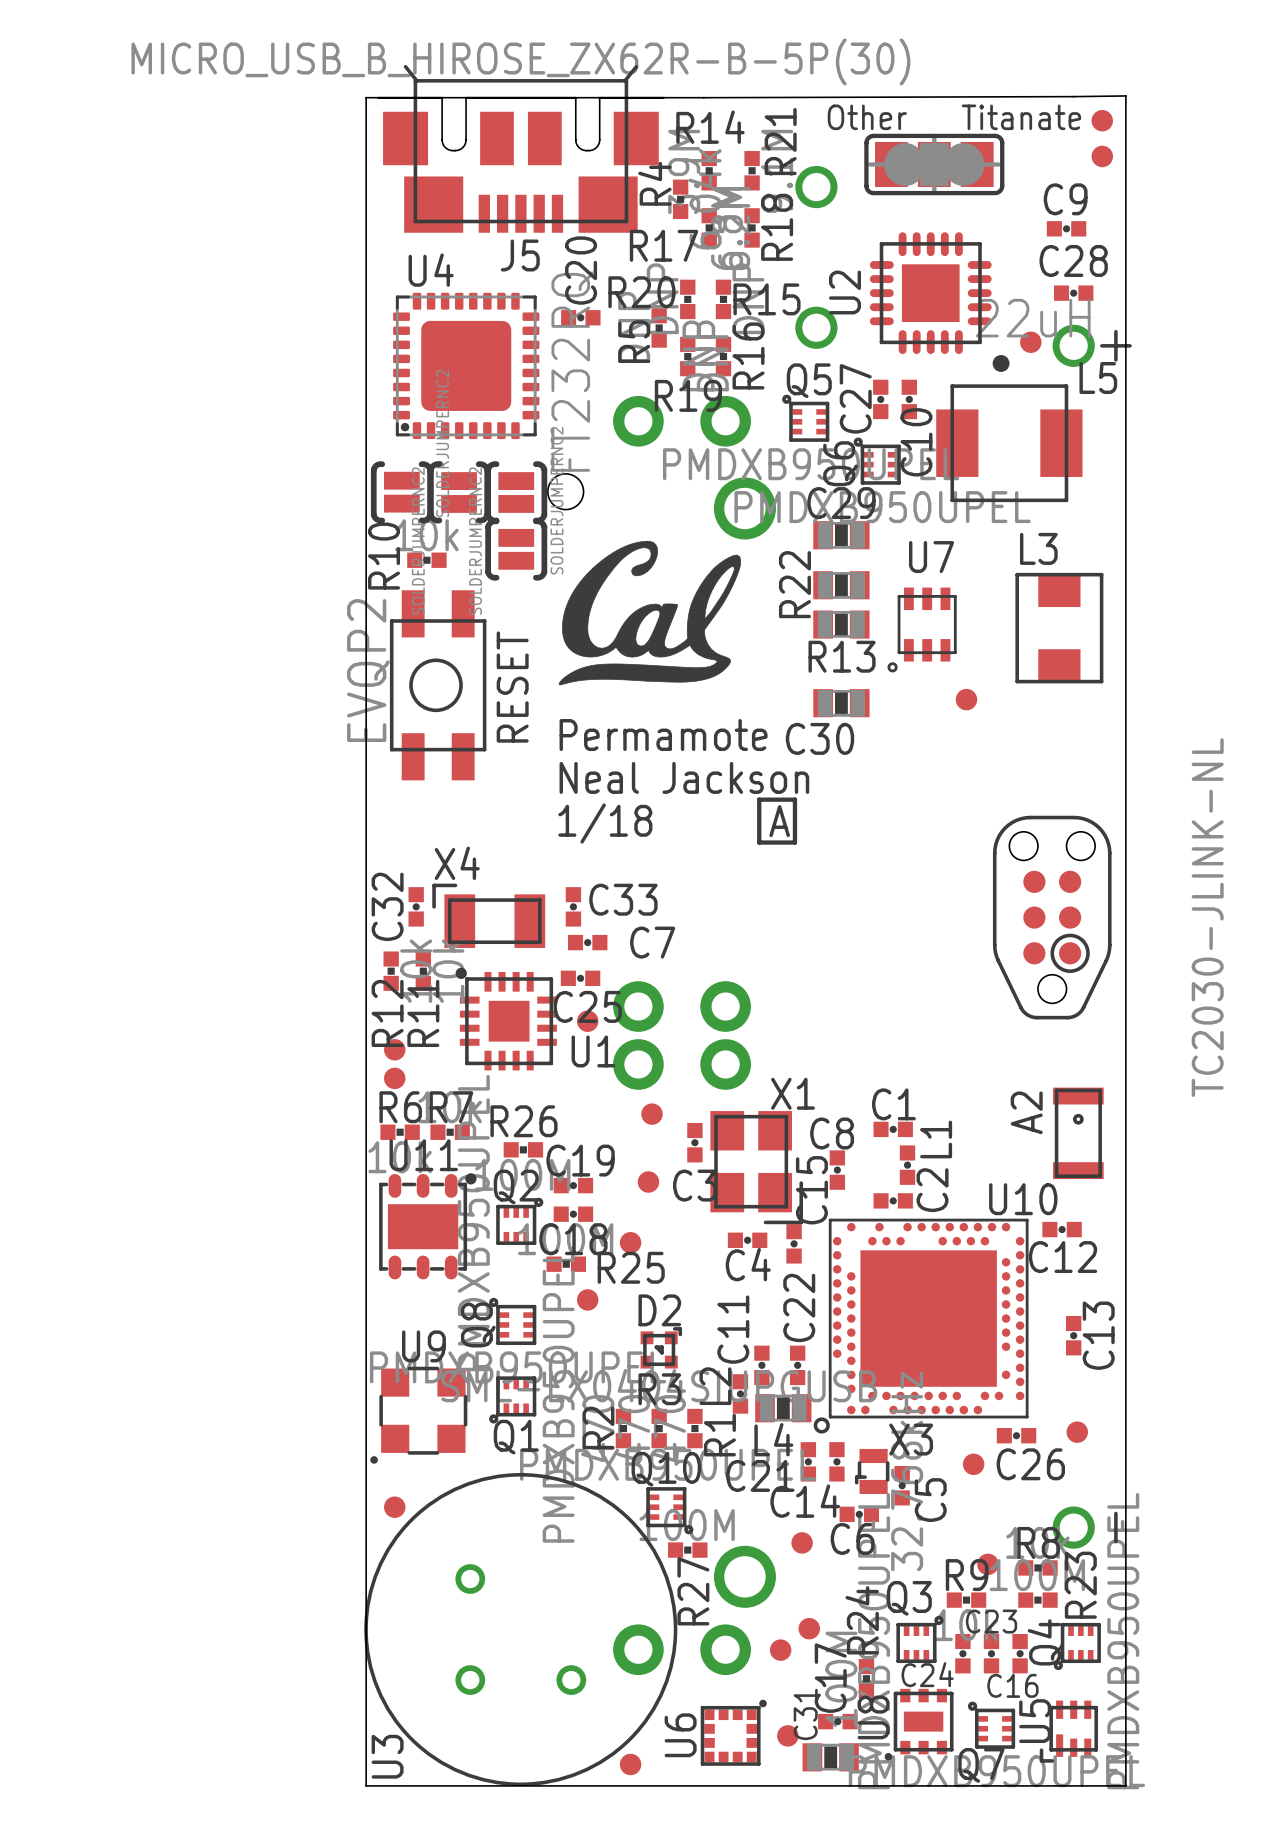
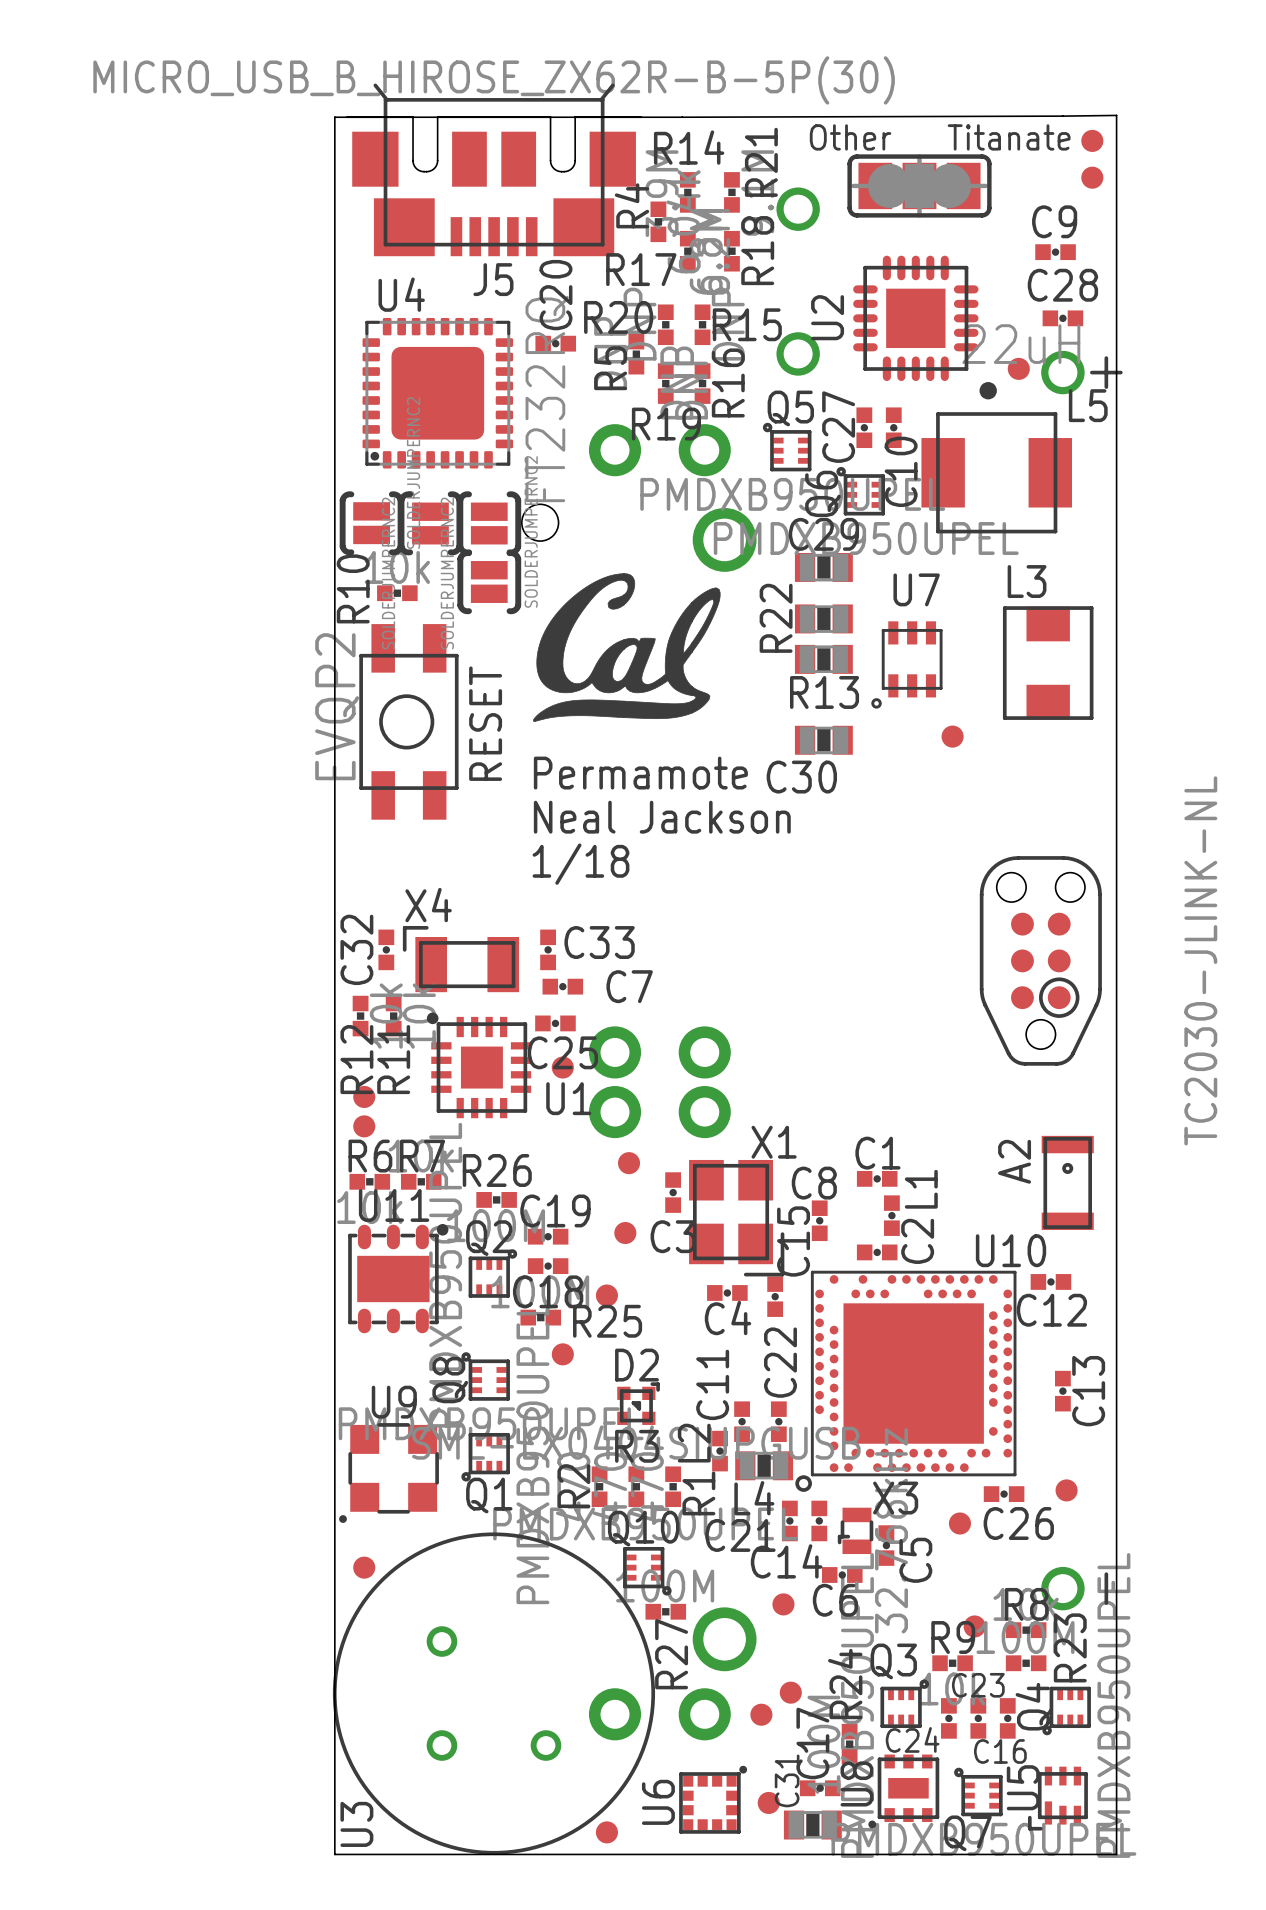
line: (759, 799) (759, 842) (794, 842) (794, 799) (759, 799) -> none
text: A (779, 821) -> none

